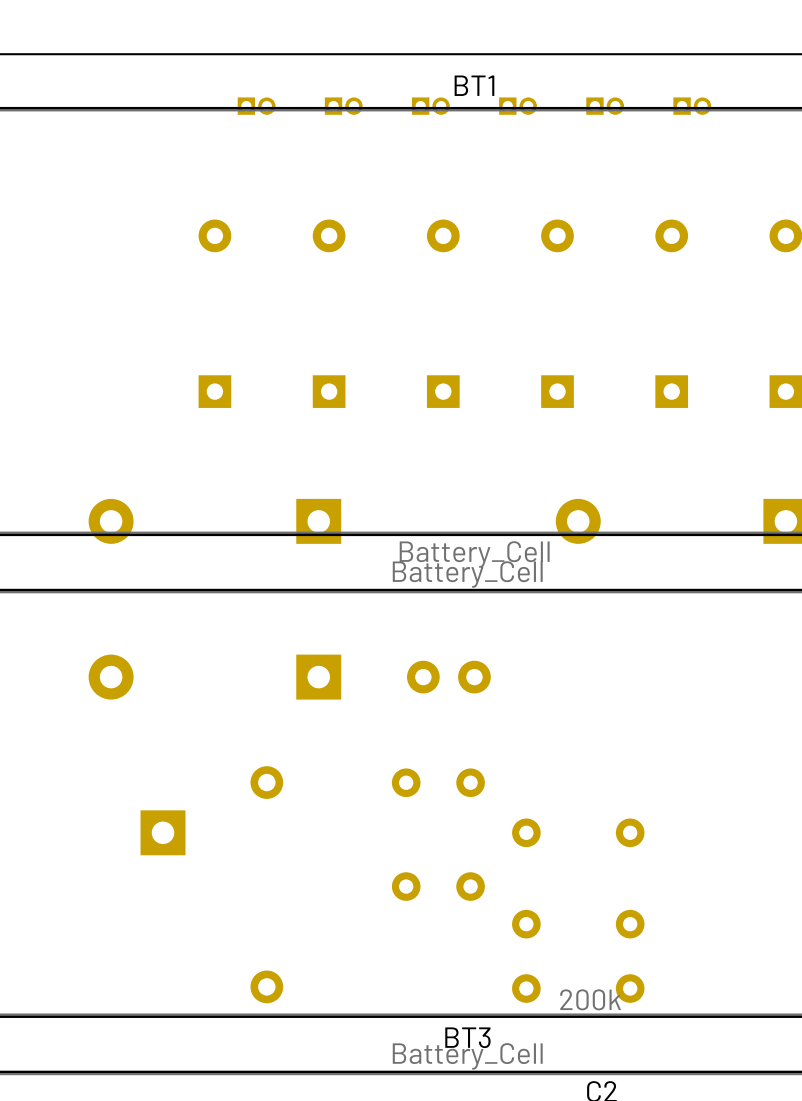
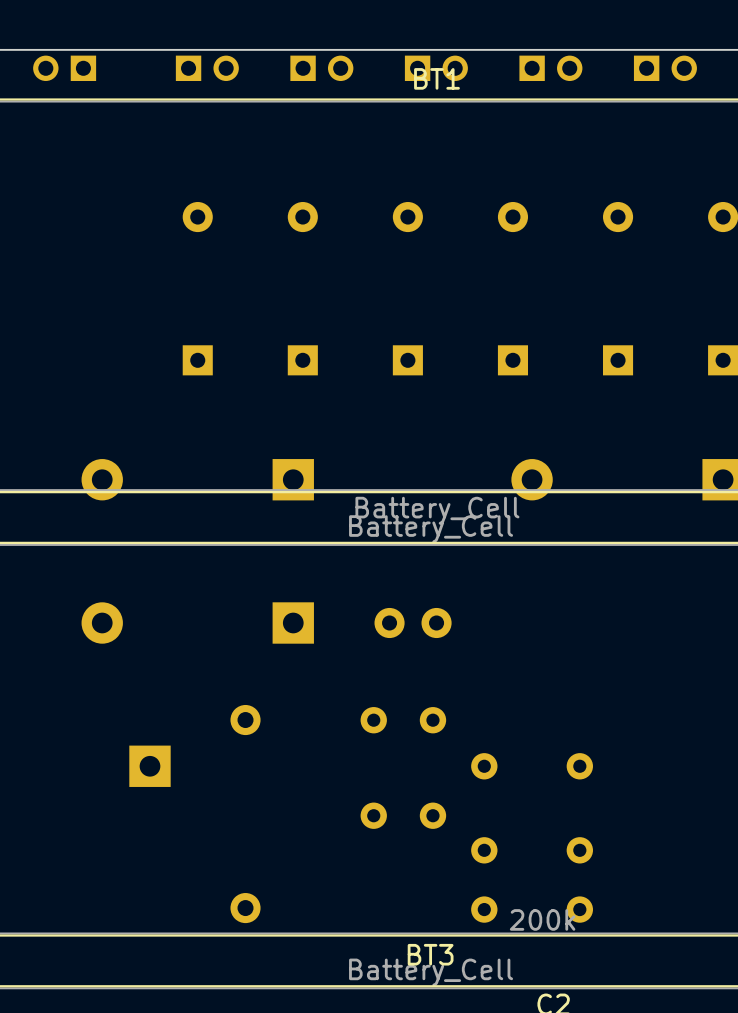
part: none -> (64, 68)
part: none -> (207, 68)
part: none -> (321, 68)
part: none -> (436, 68)
part: none -> (550, 68)
part: none -> (665, 68)
part: (256, 106) -> none
part: (343, 106) -> none
part: (430, 106) -> none
part: (518, 106) -> none
part: (605, 106) -> none
part: (692, 106) -> none

